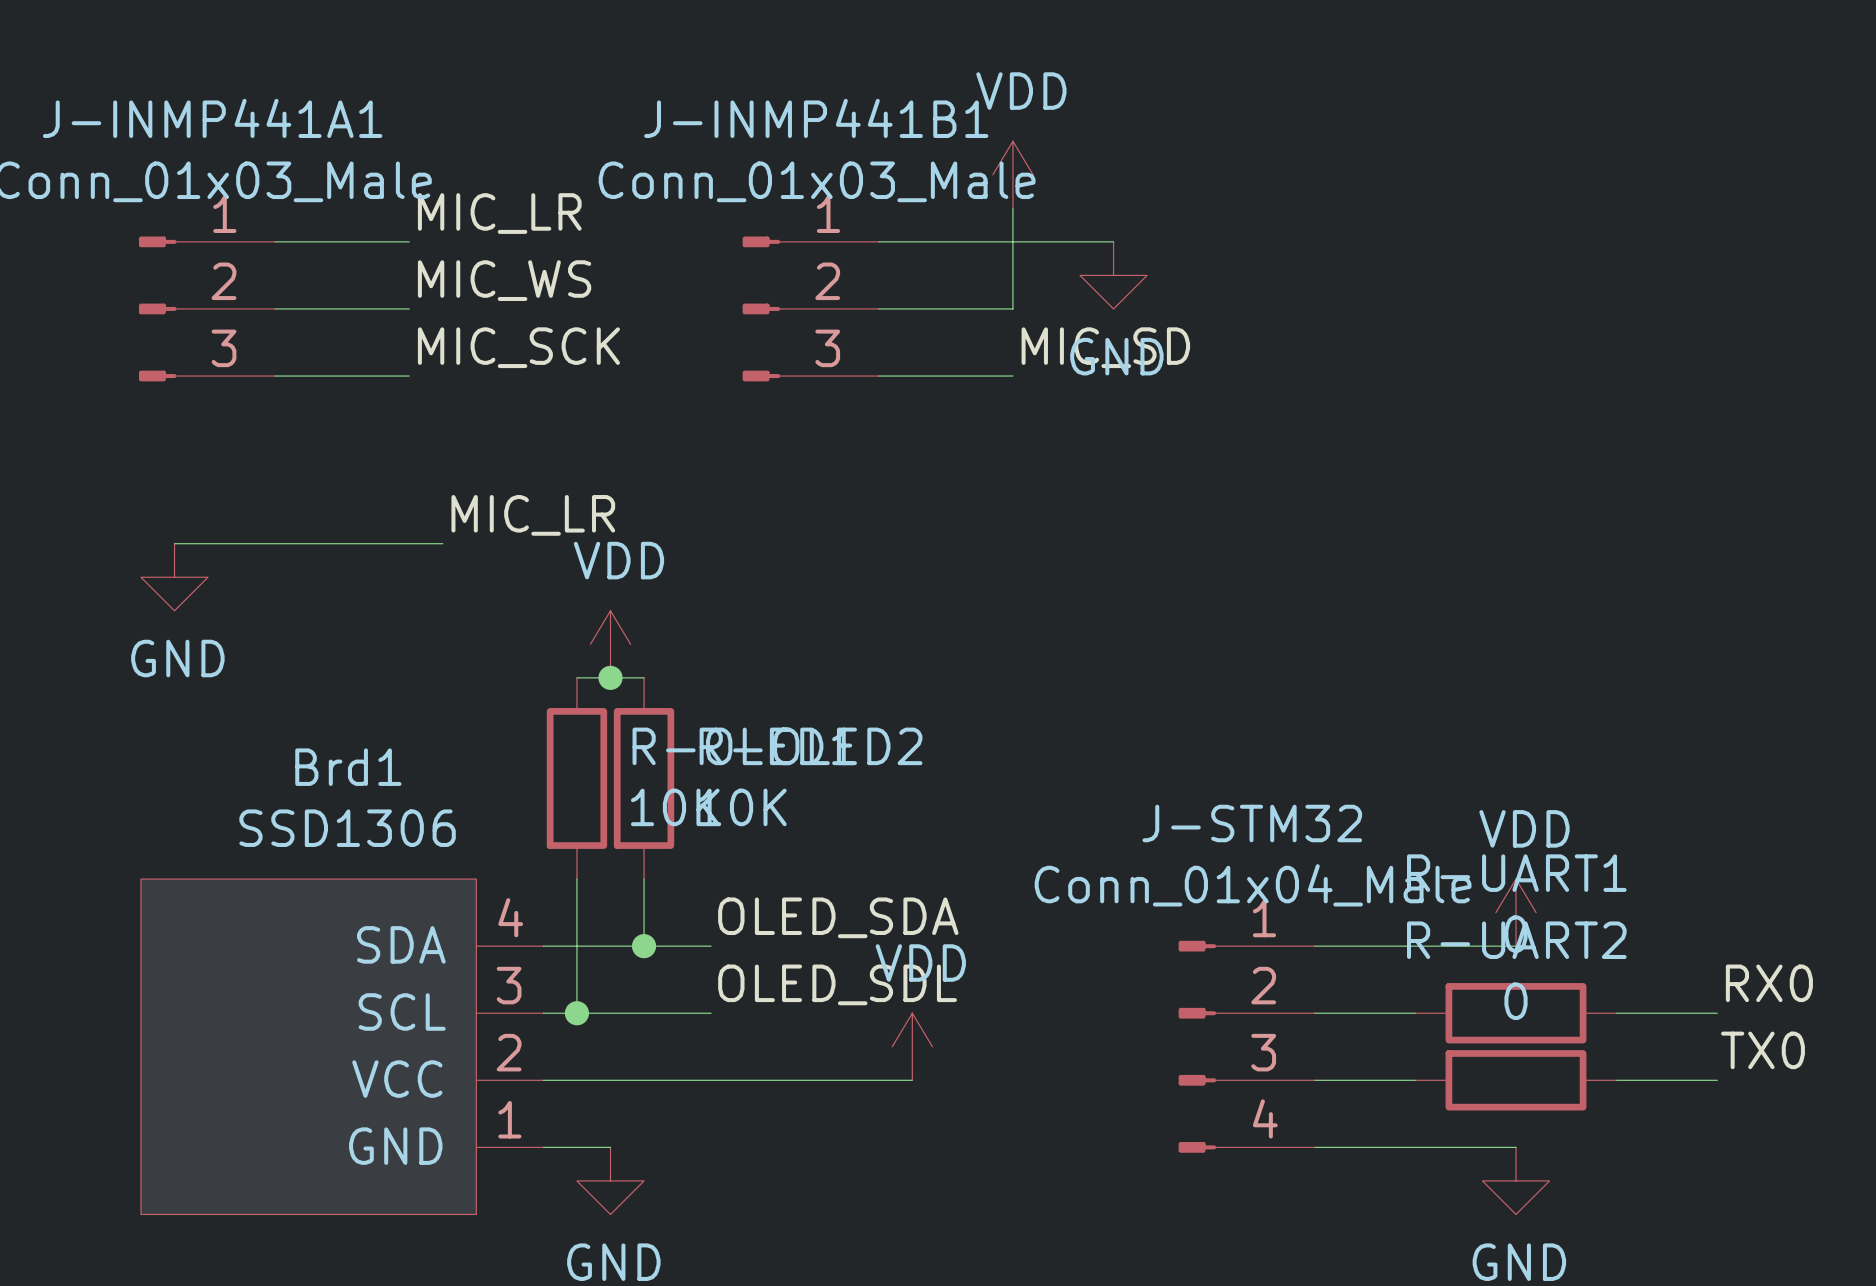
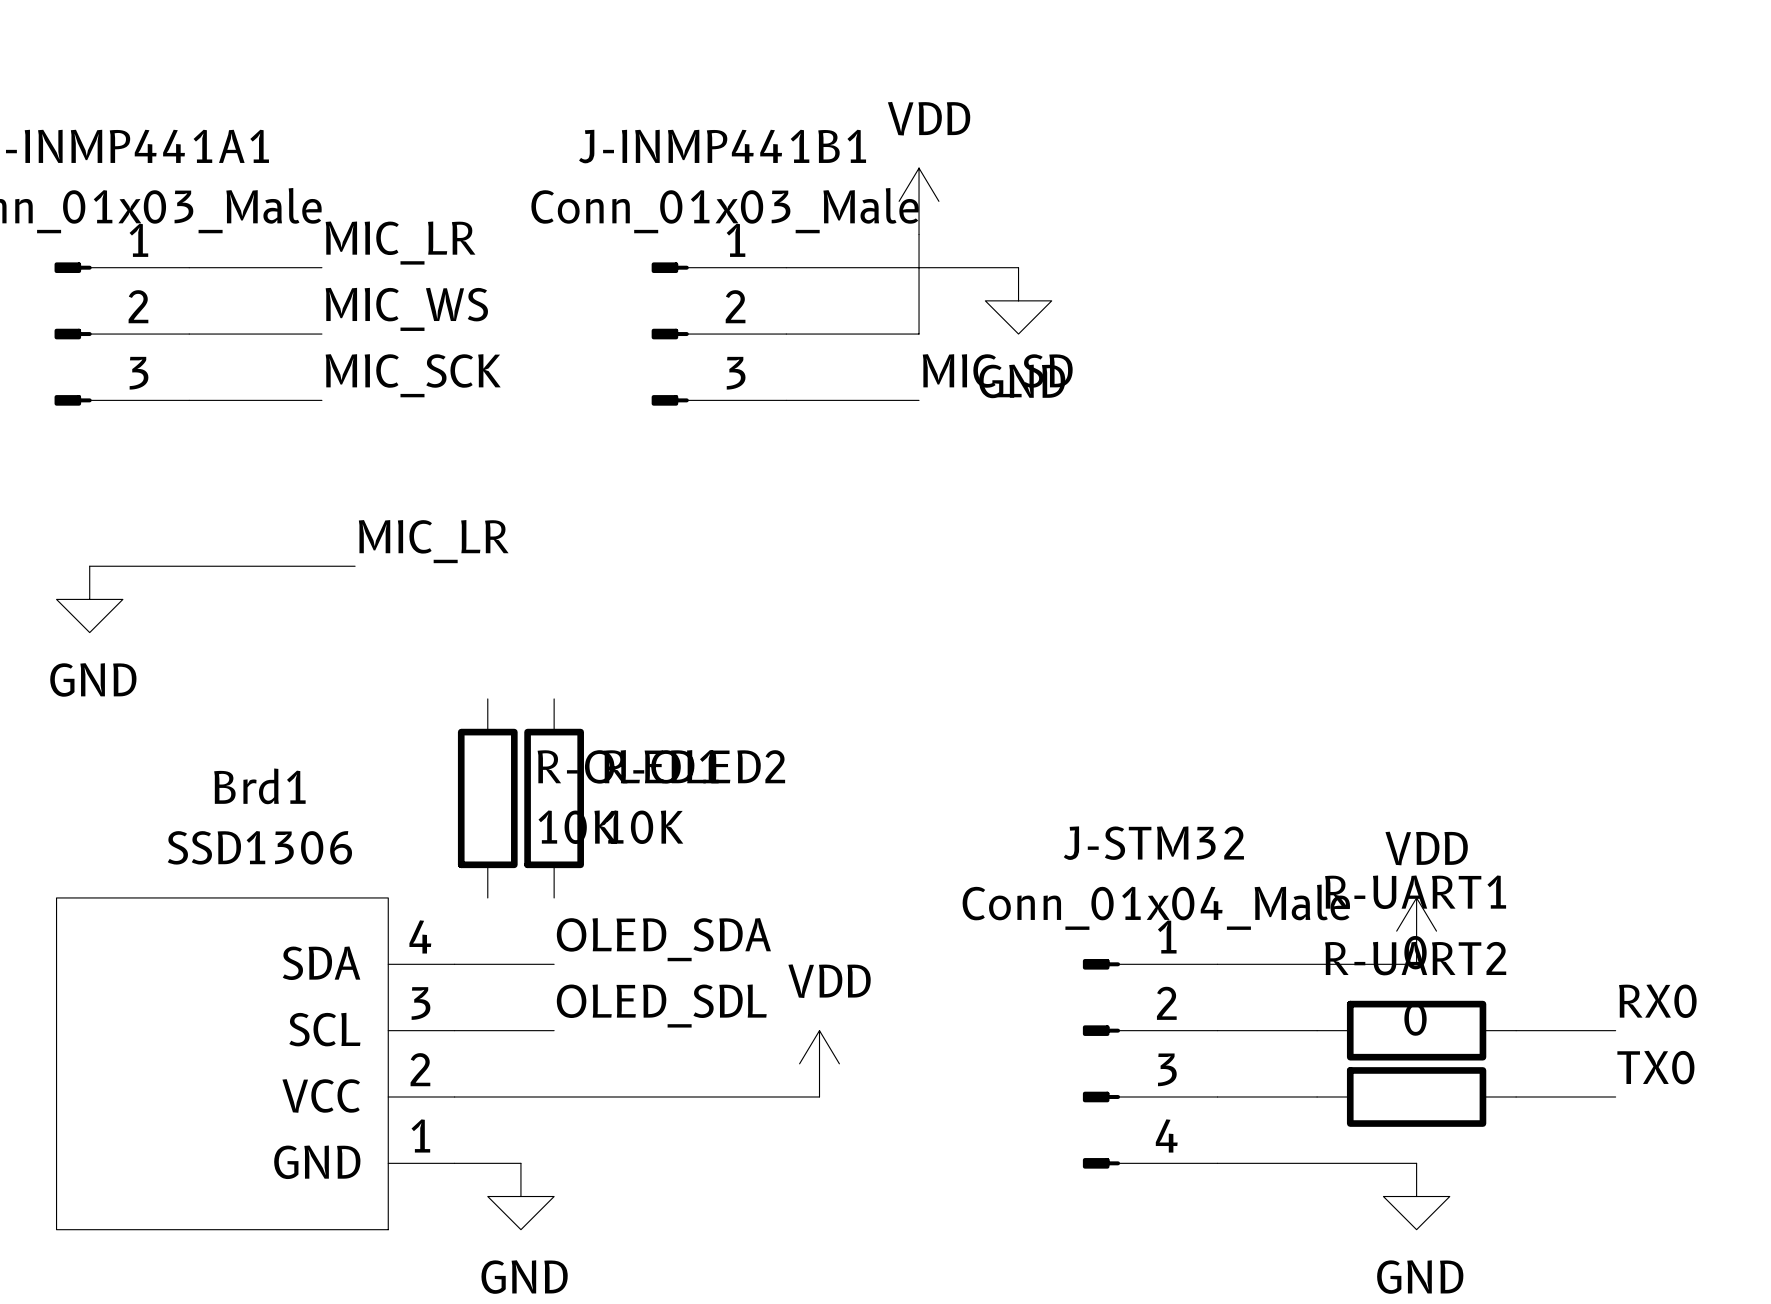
power symbol: VDD (610, 644) -> none
wire: (576, 677) (644, 677) -> none
junction: (610, 677) -> none
wire: (576, 879) (576, 1013) -> none
wire: (644, 879) (644, 946) (711, 946) -> none
label position: OLED_SDA (838, 917) -> OLED_SDA (663, 939)
junction: (644, 946) -> none
label position: OLED_SDL (837, 984) -> OLED_SDL (661, 1006)
junction: (576, 1013) -> none
wire: (644, 1013) (711, 1013) -> none

